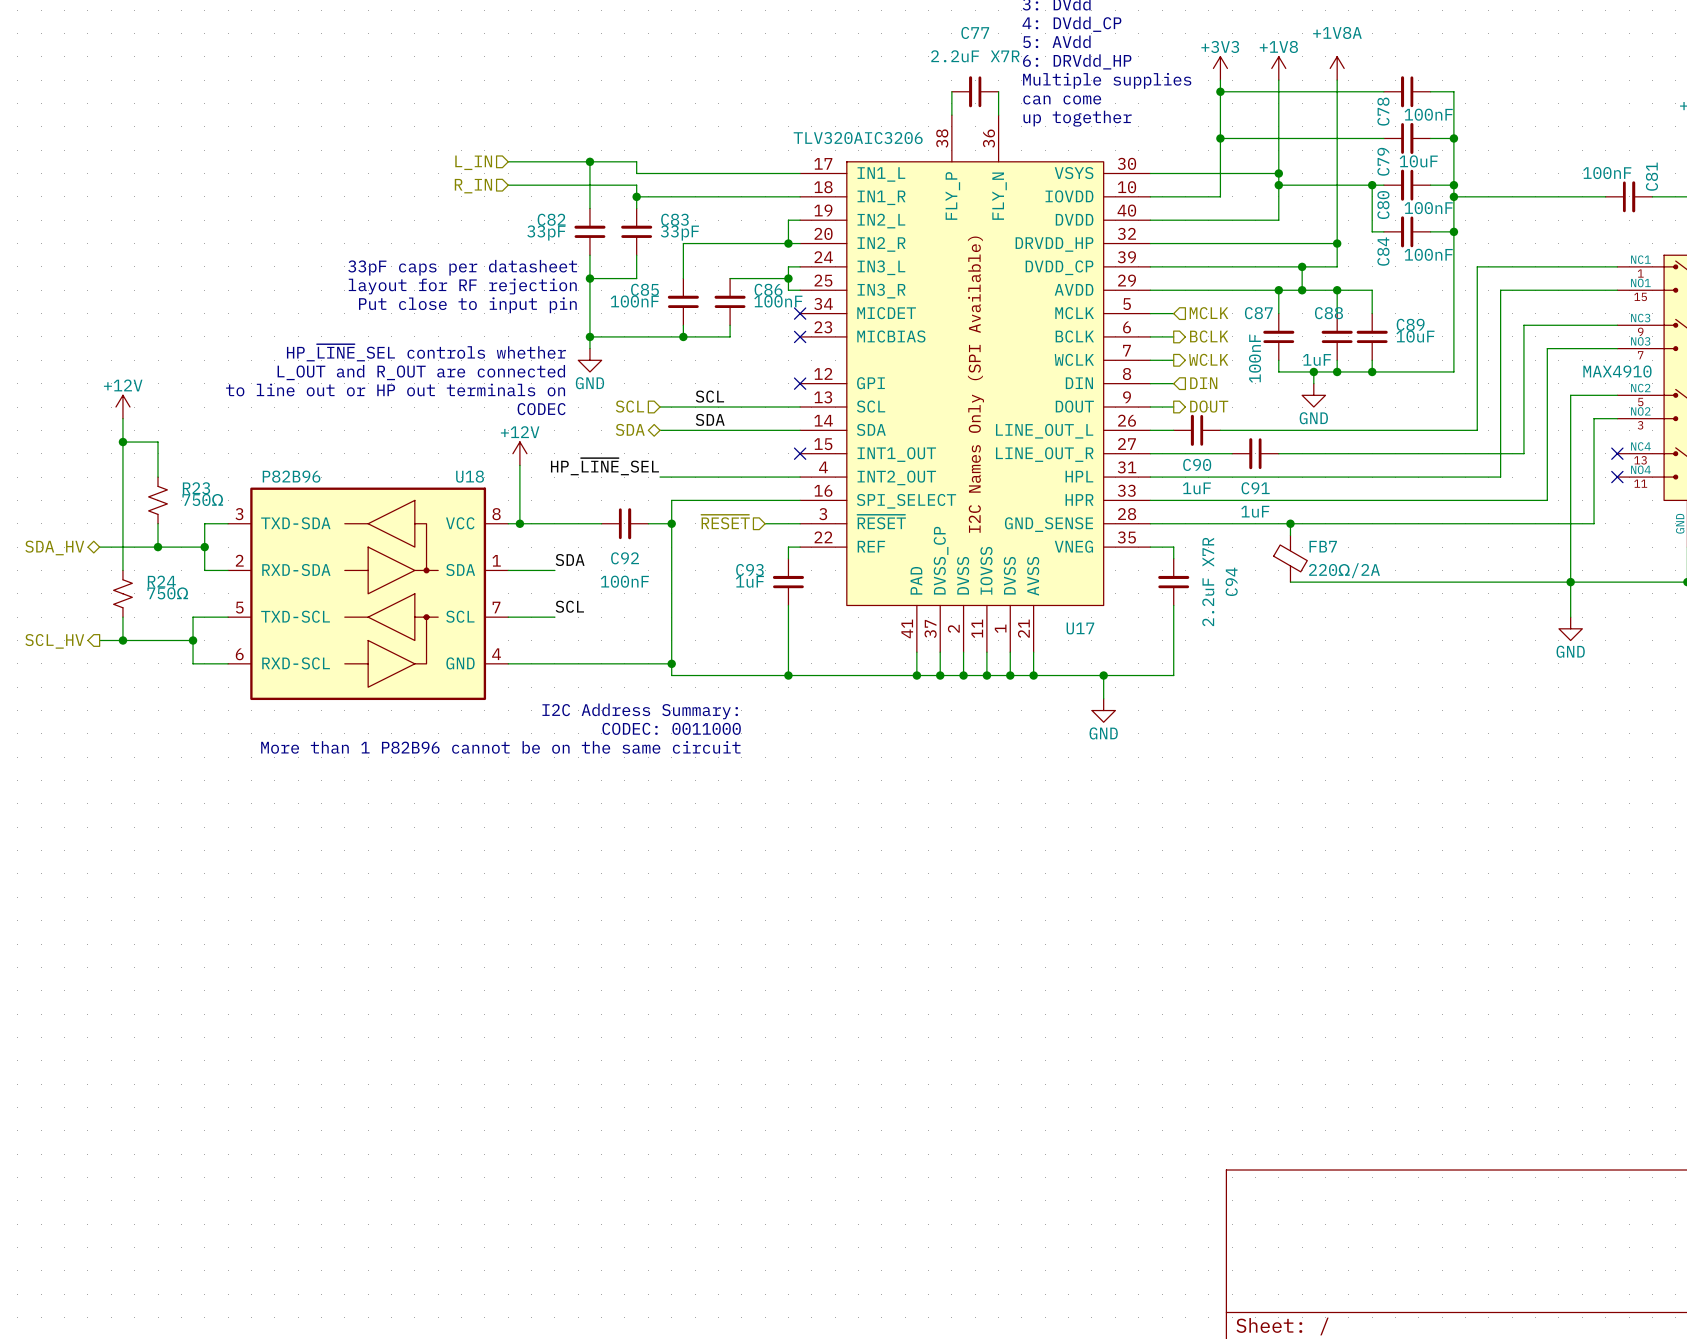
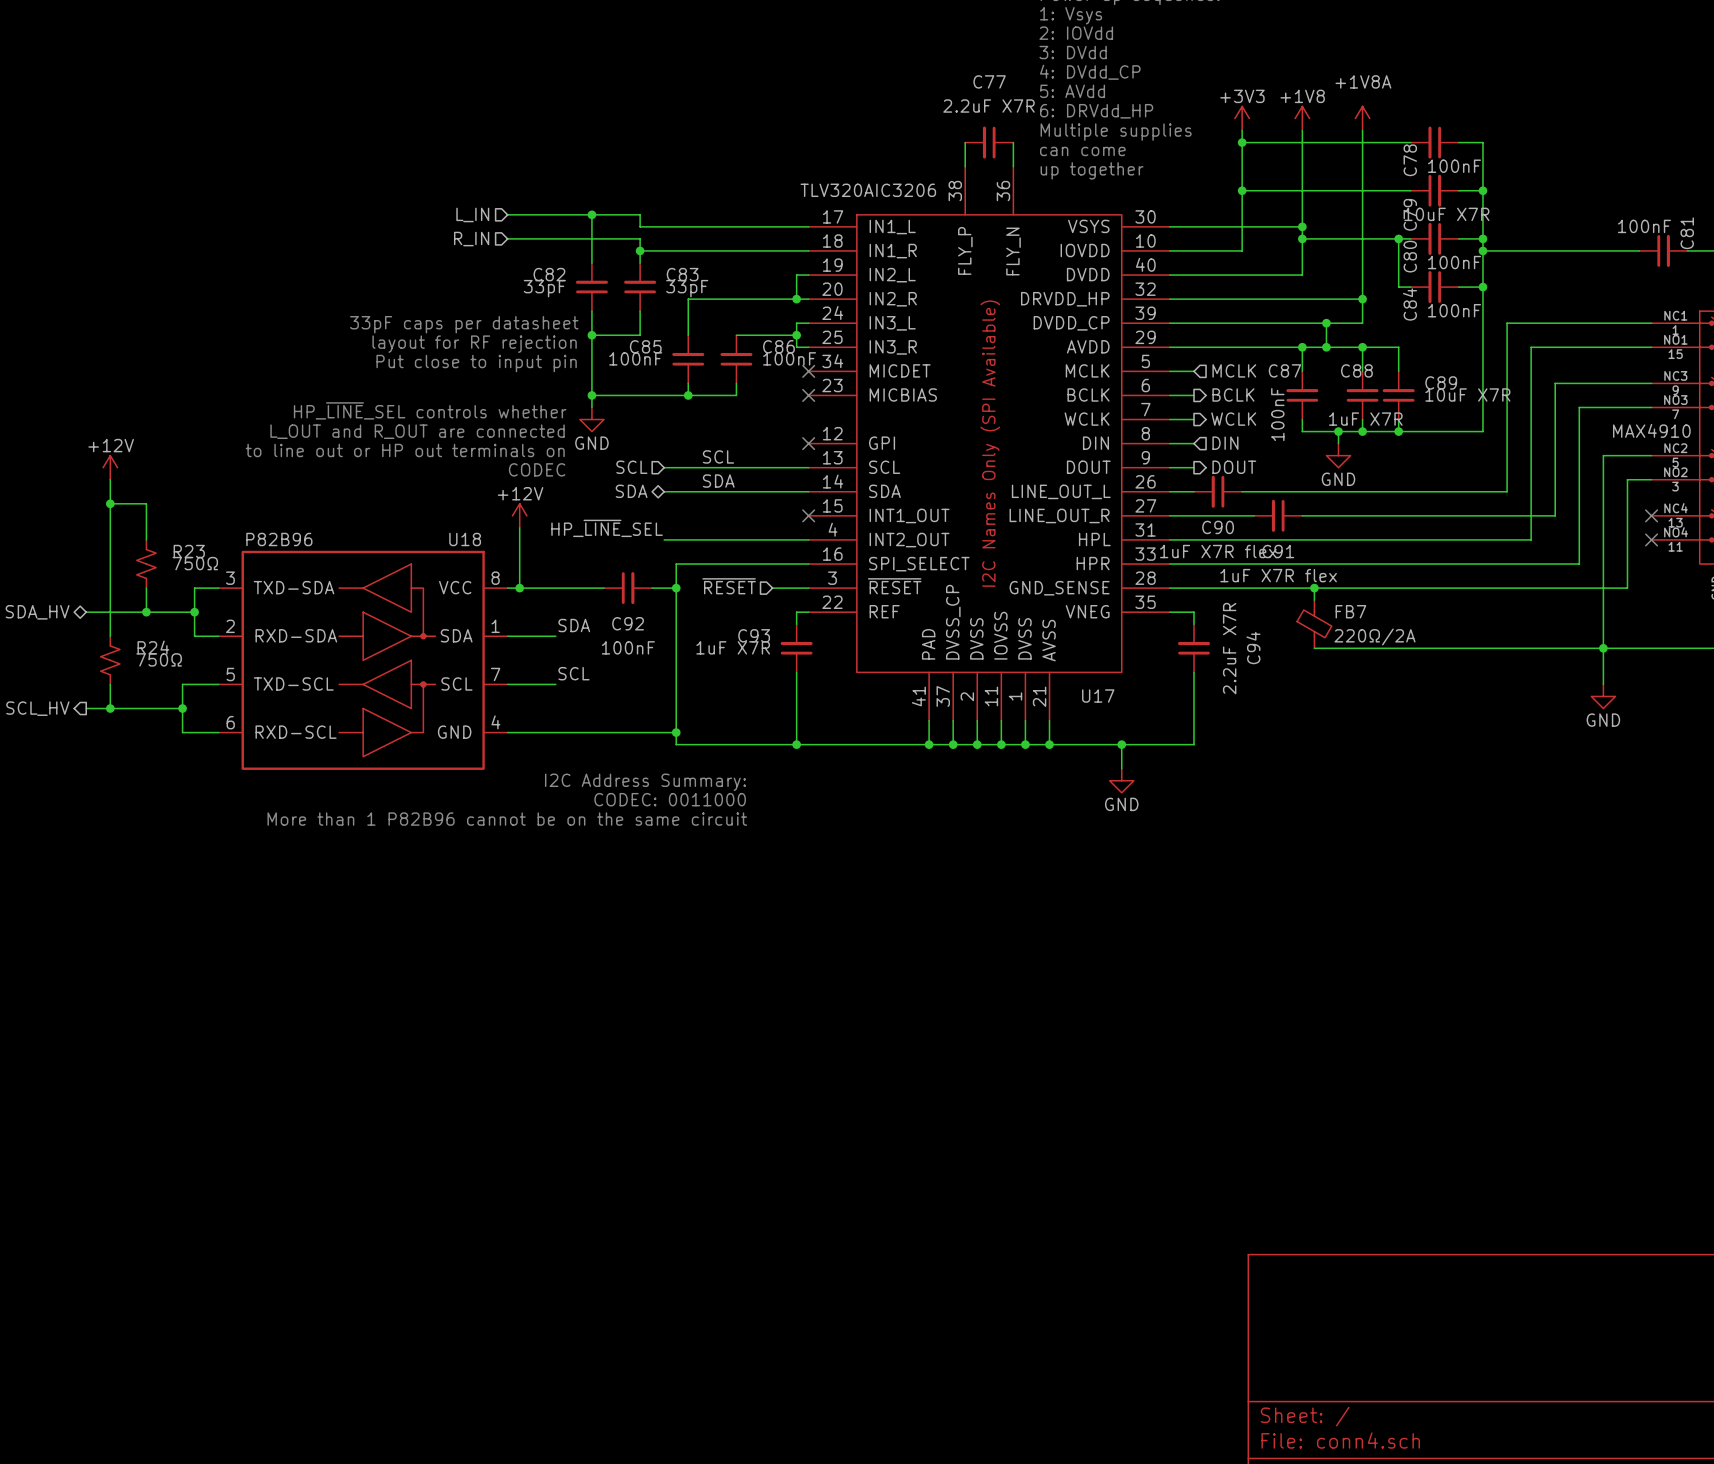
C79 value: 10uF (1418, 161) -> 10uF X7R (1446, 214)
C89 value: 10uF (1415, 336) -> 10uF X7R (1467, 395)
C88 value: 1uF (1317, 359) -> 1uF X7R (1365, 419)
C90 value: 1uF (1196, 488) -> 1uF X7R flex (1218, 551)
C91 value: 1uF (1255, 511) -> 1uF X7R flex (1278, 575)
C93 value: 1uF (749, 581) -> 1uF X7R (733, 647)

